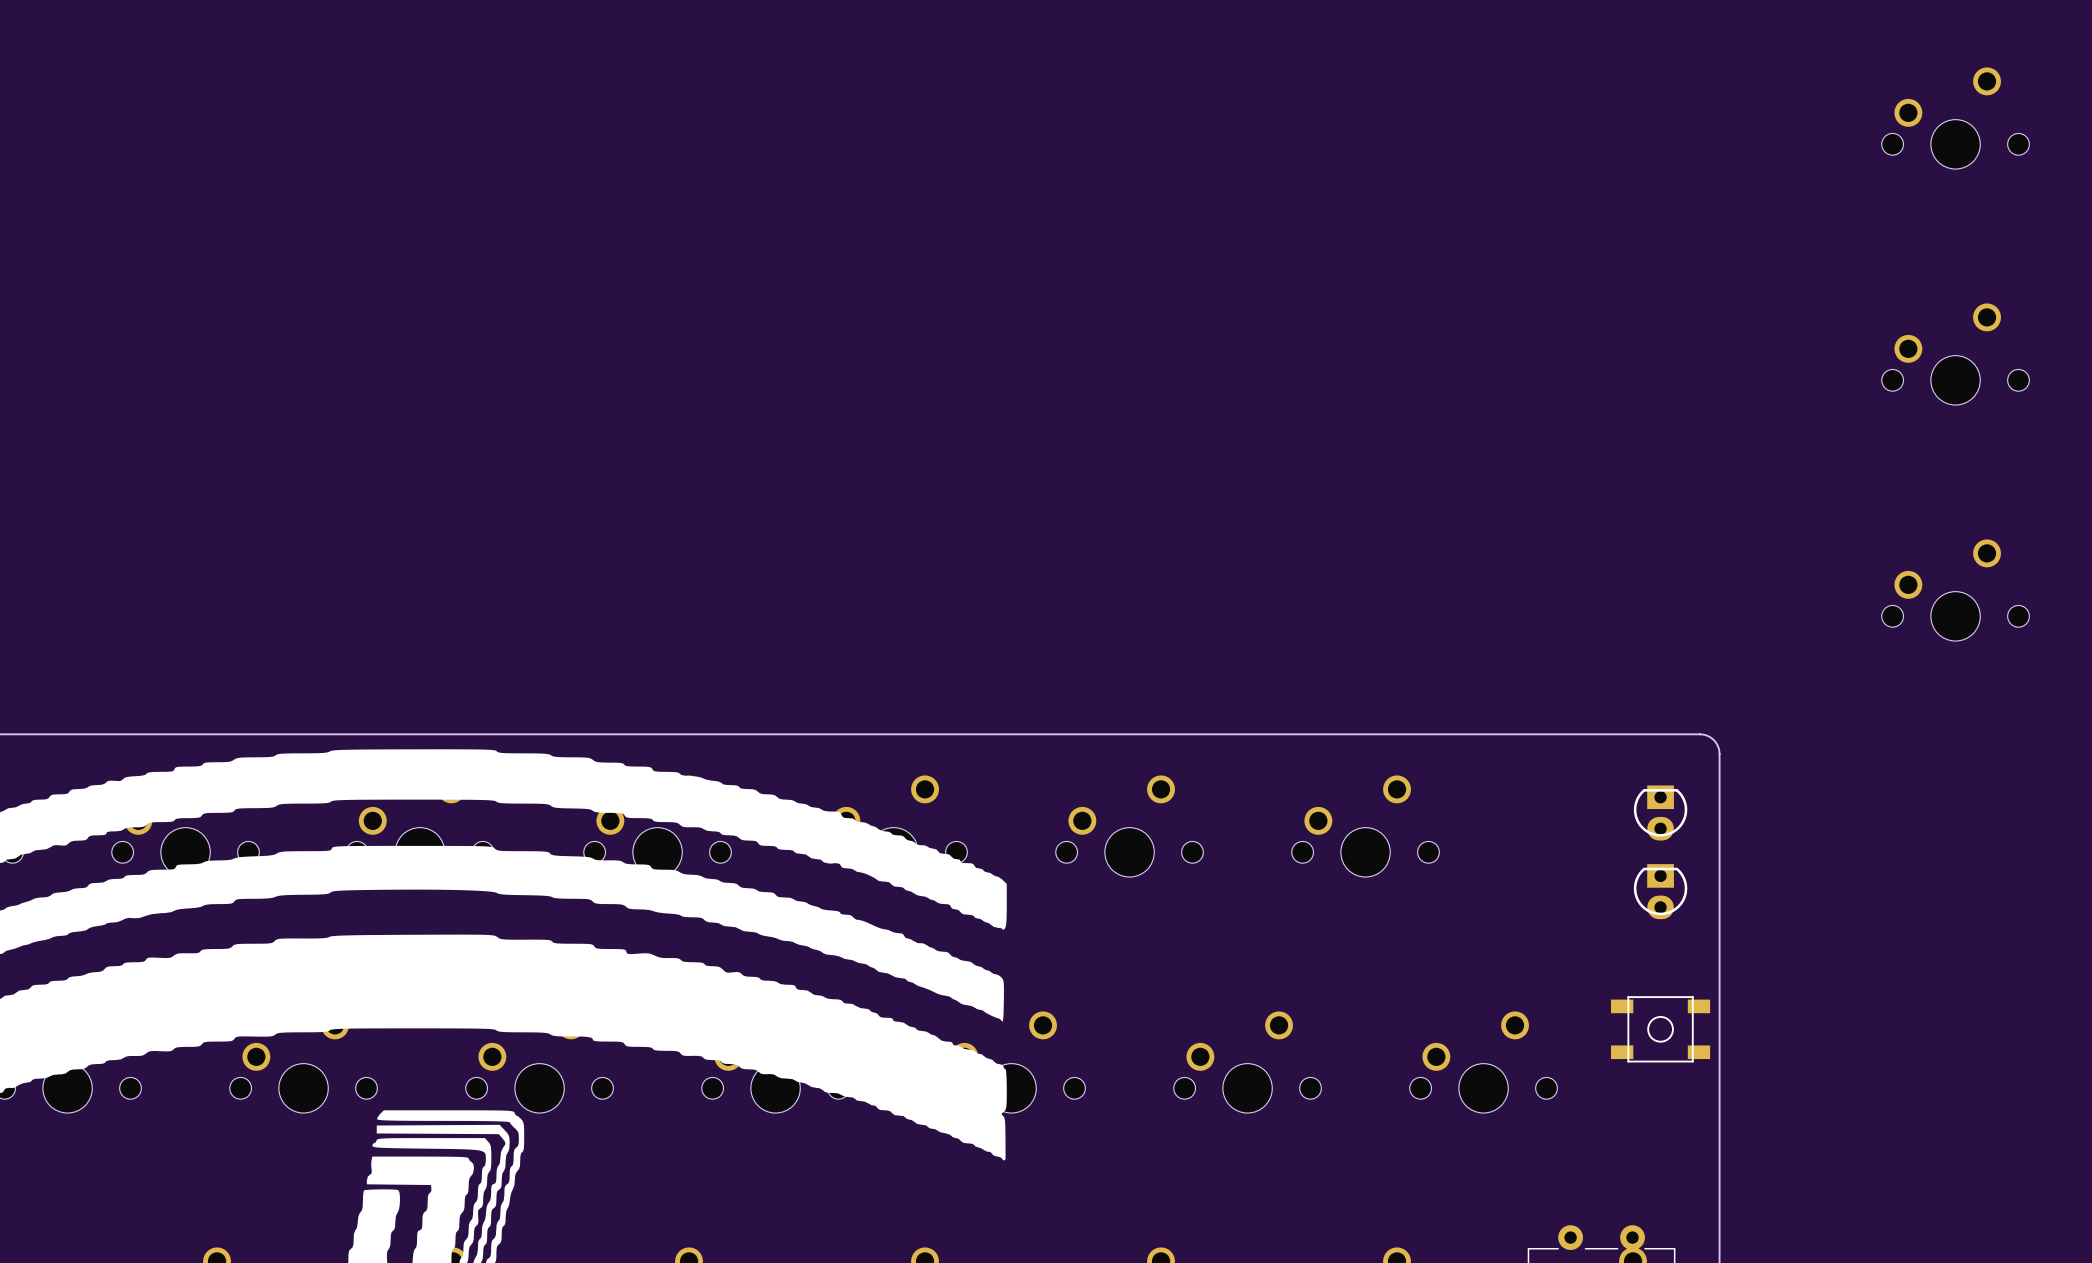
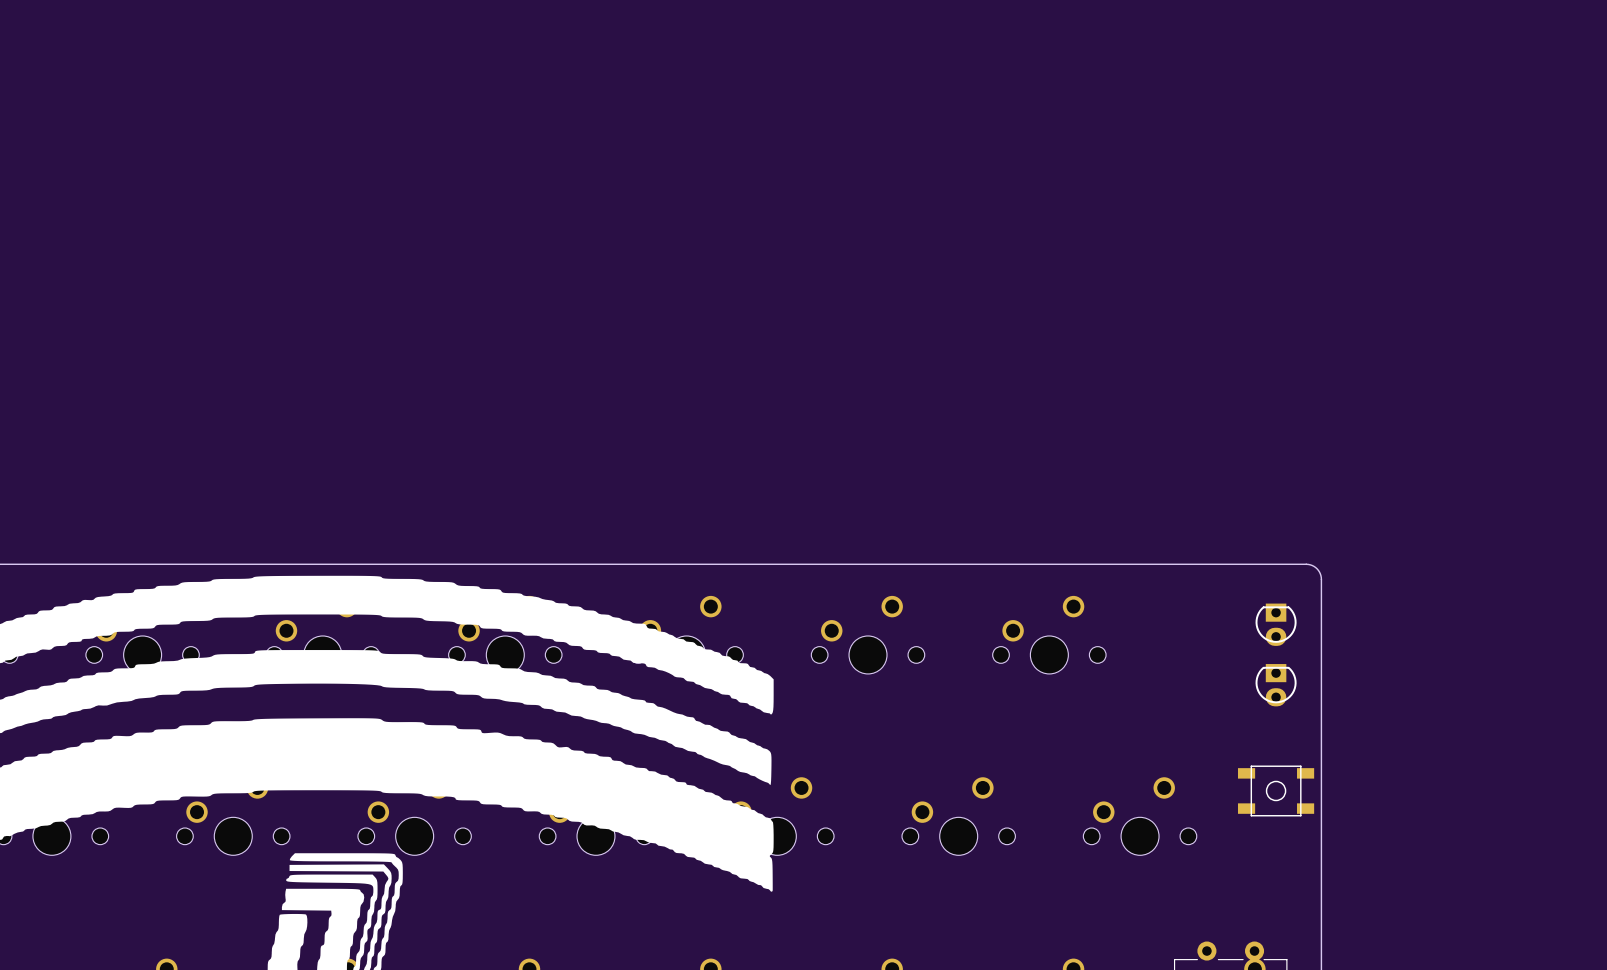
part: (1955, 118) -> none
part: (1955, 354) -> none
part: (1955, 590) -> none

